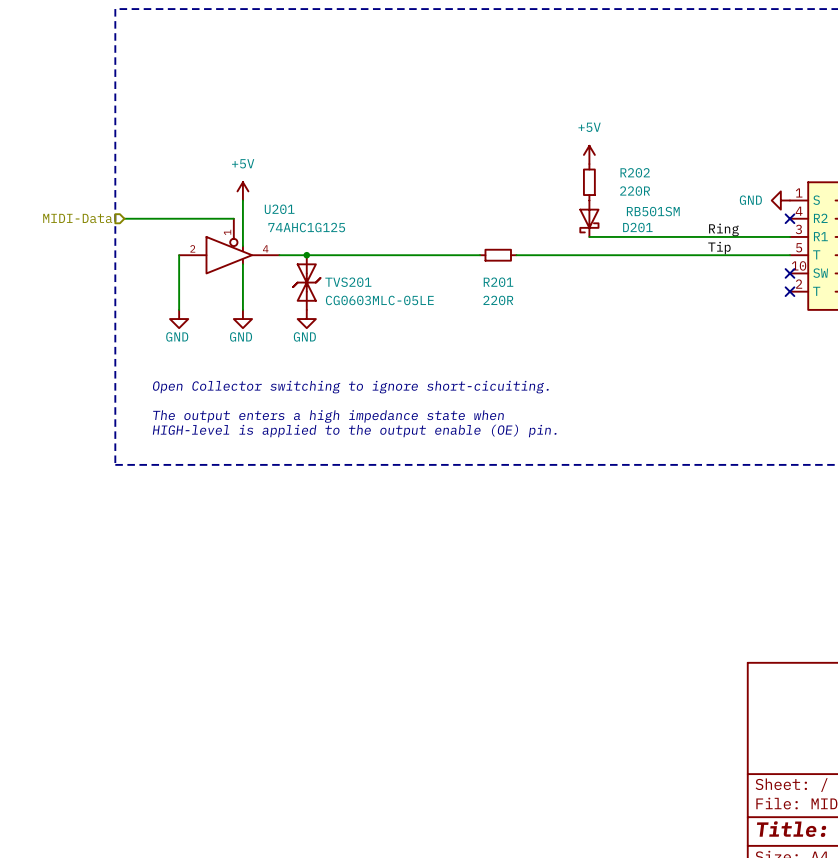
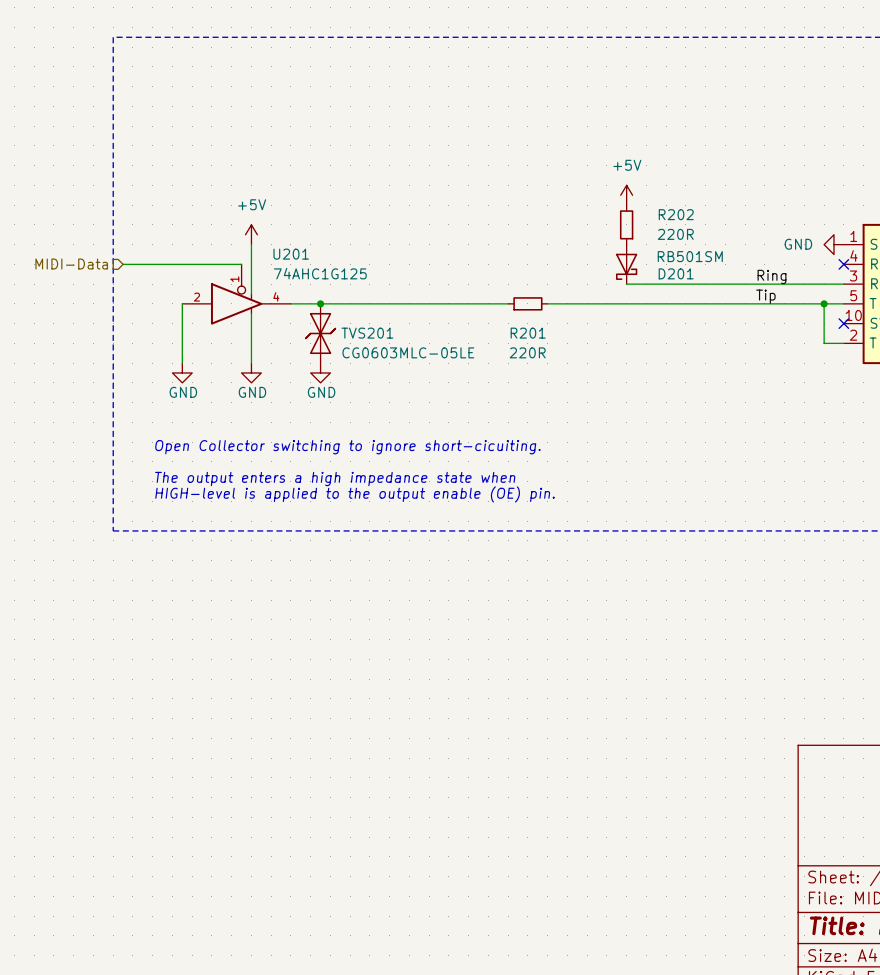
wire: none -> (824, 303) (824, 343) (843, 343)
junction: none -> (824, 303)
no-connect mark: (789, 291) -> none

